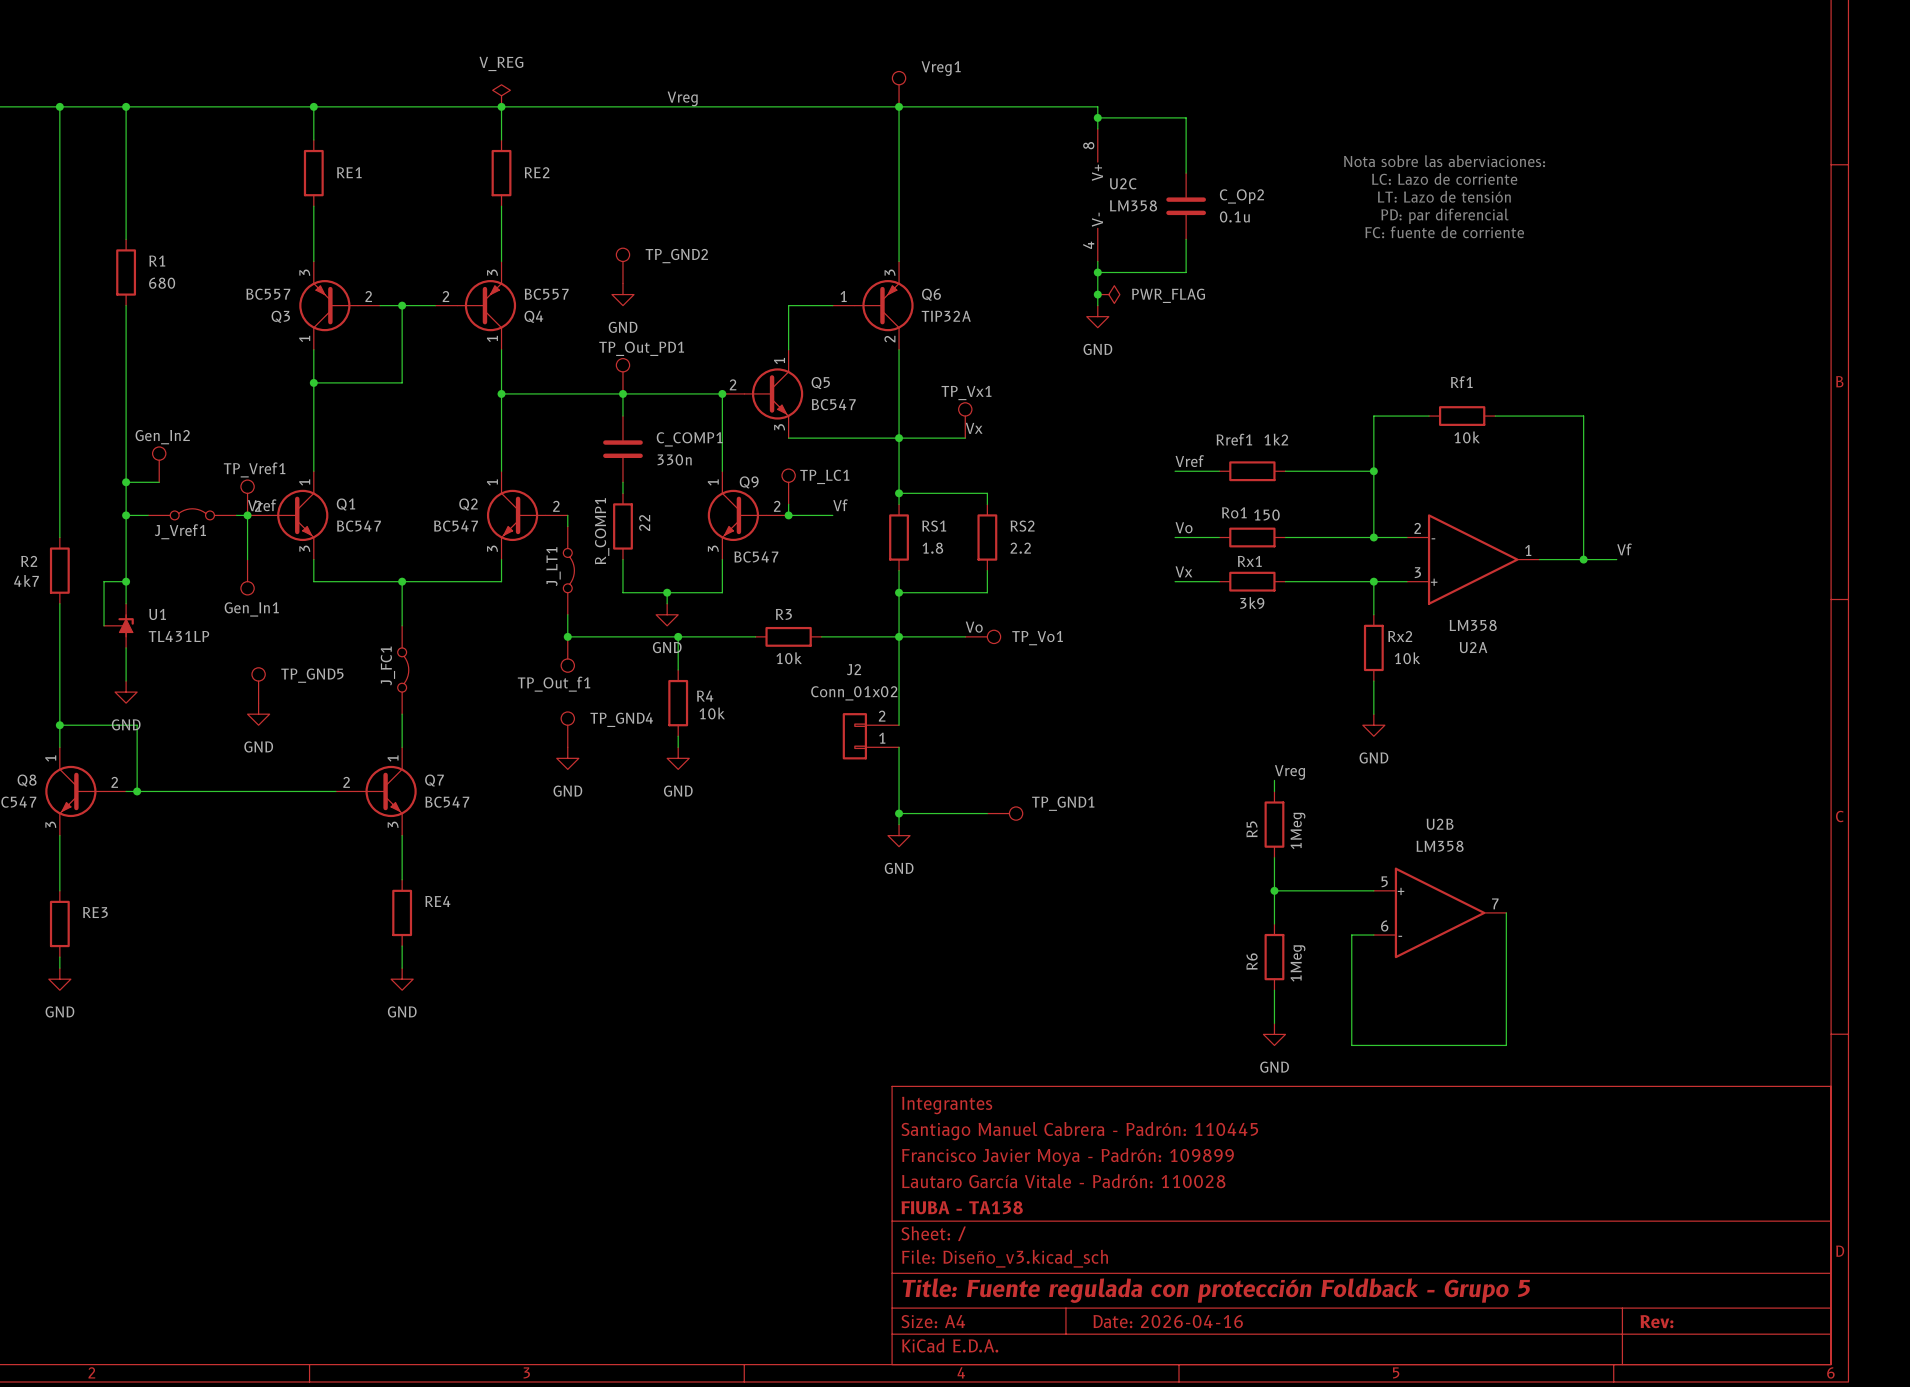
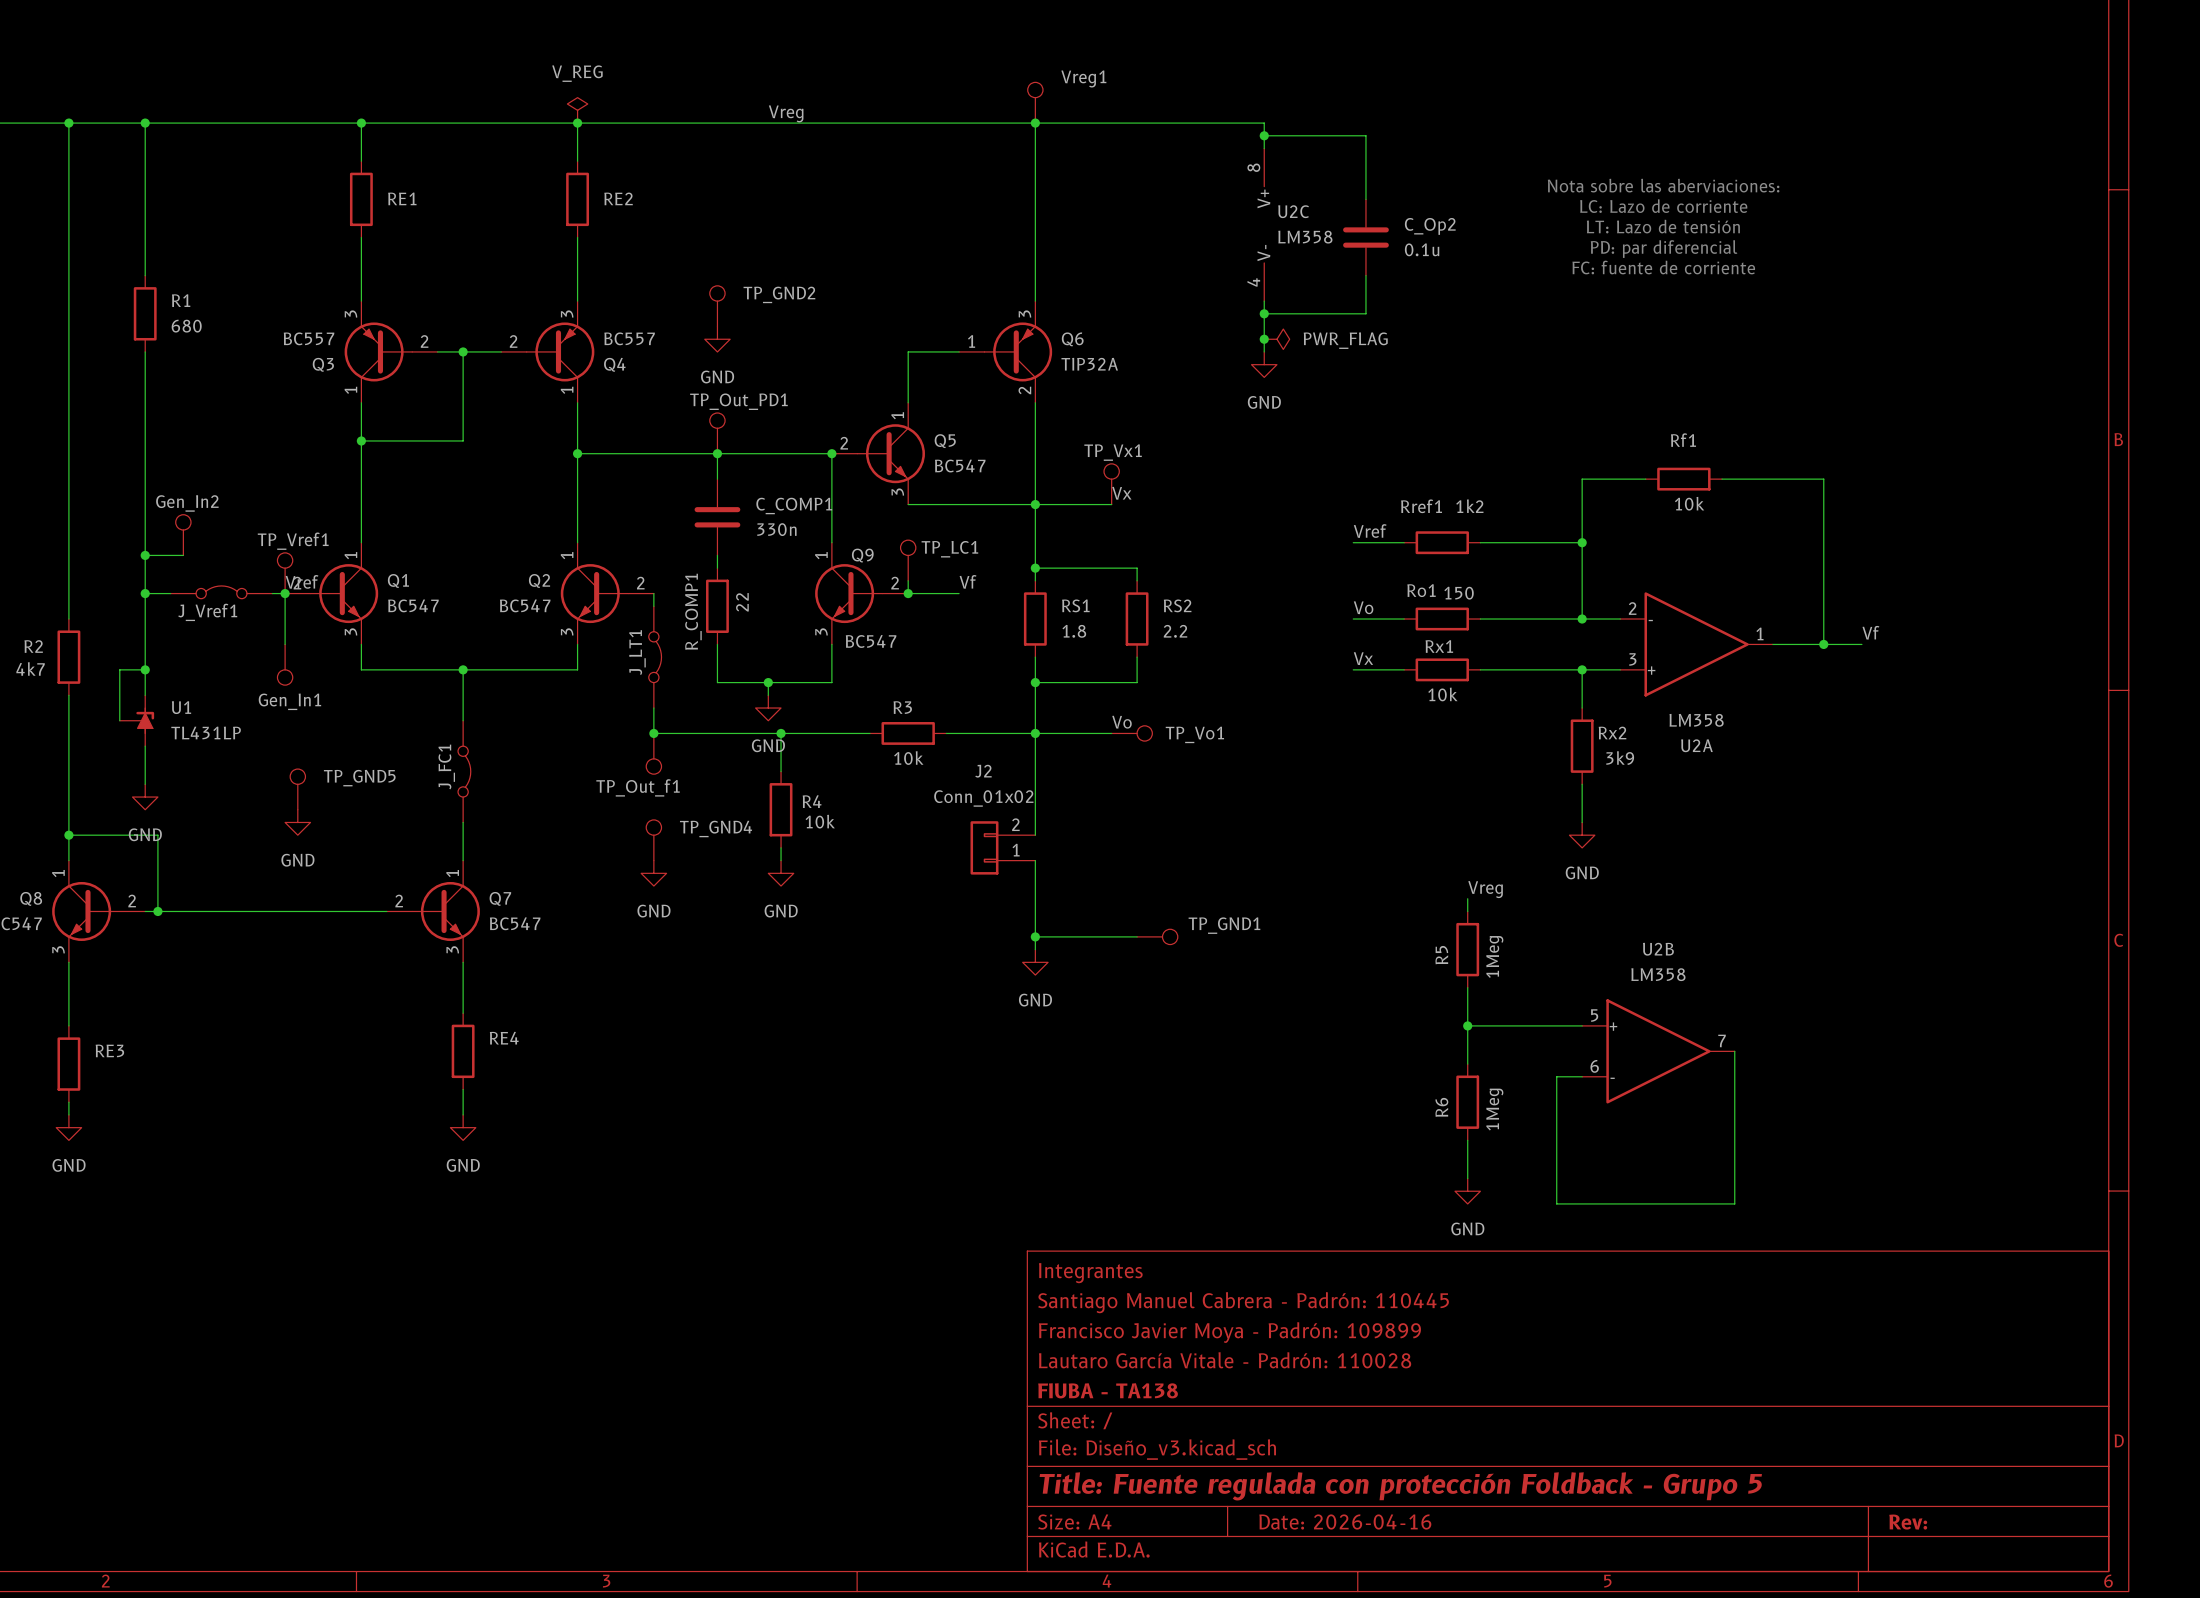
Rx1 value: 3k9 (1252, 603) -> 10k (1442, 694)
Rx2 value: 10k (1407, 658) -> 3k9 (1620, 758)

